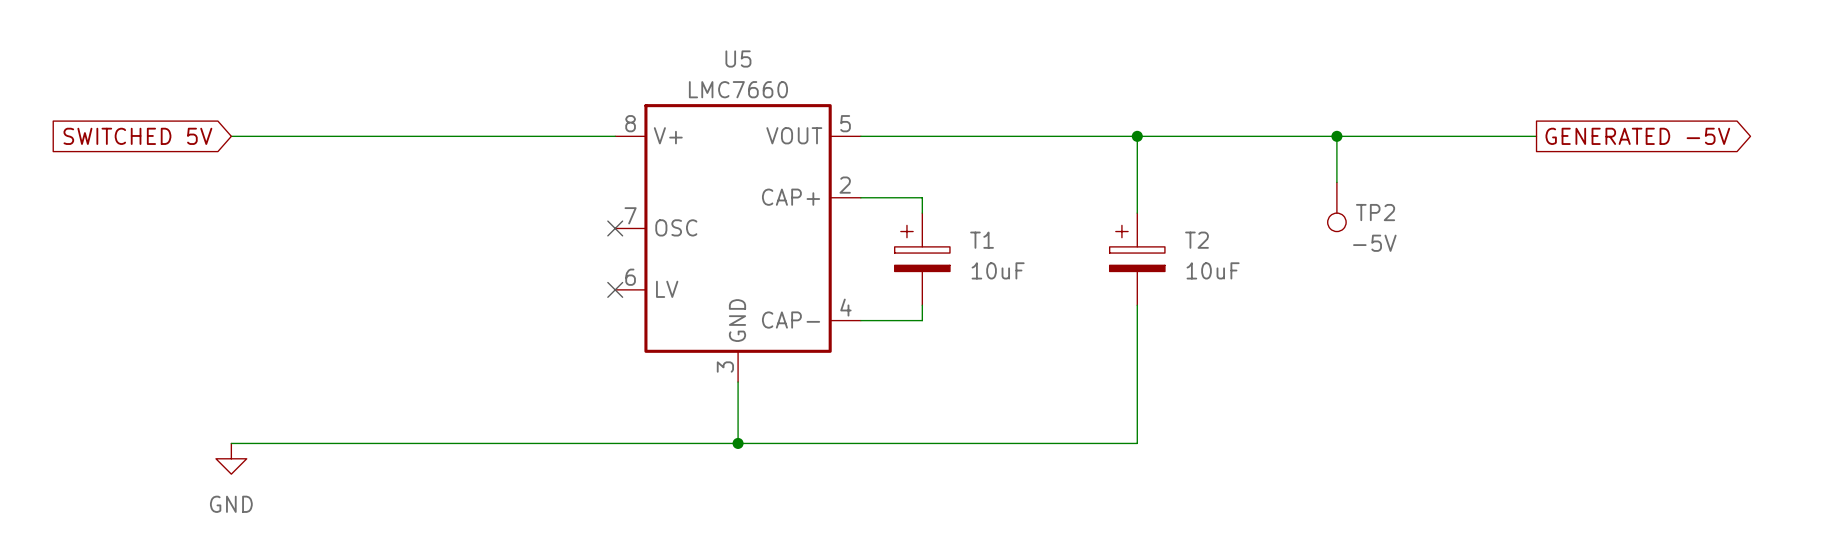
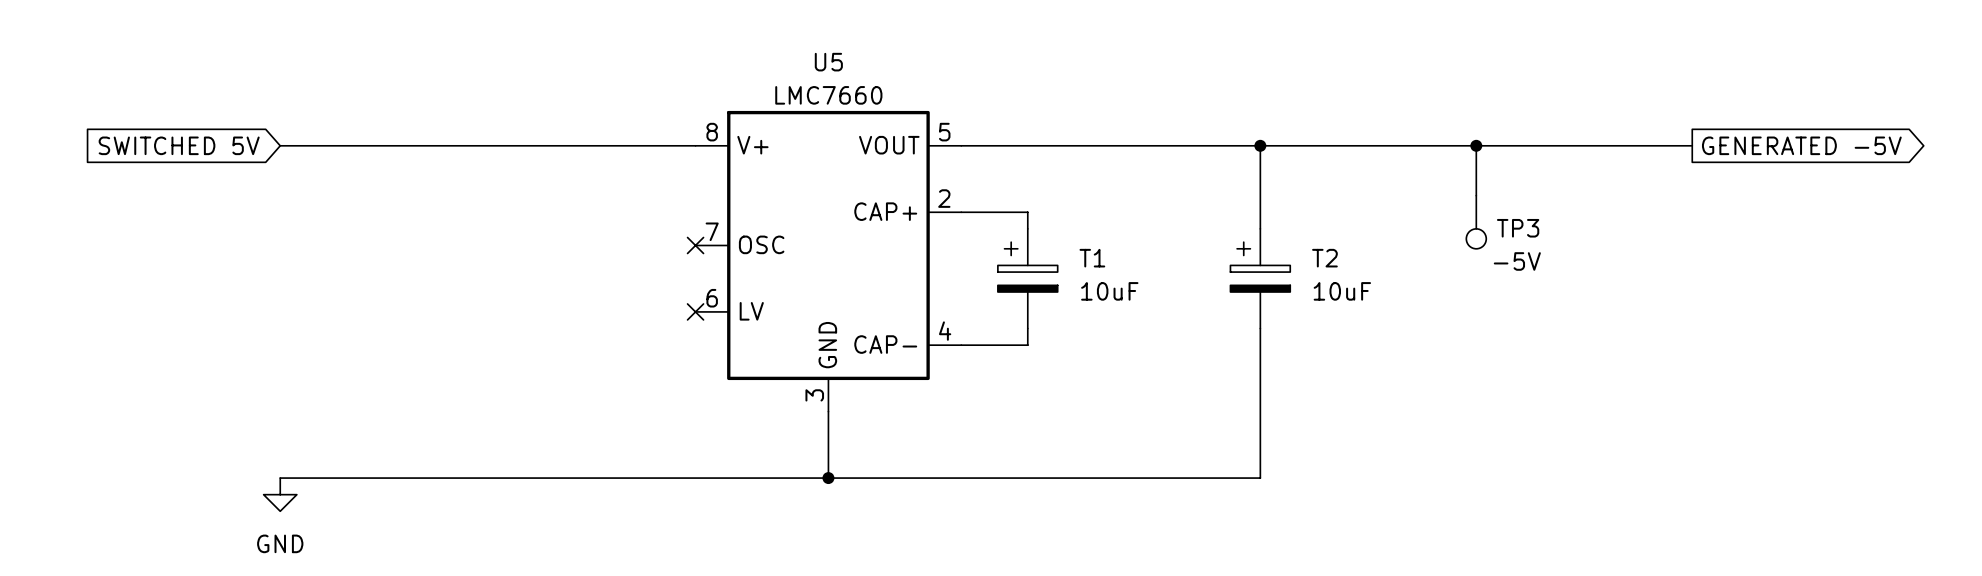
TP2 name: TP2 (1375, 212) -> TP3 (1518, 228)

